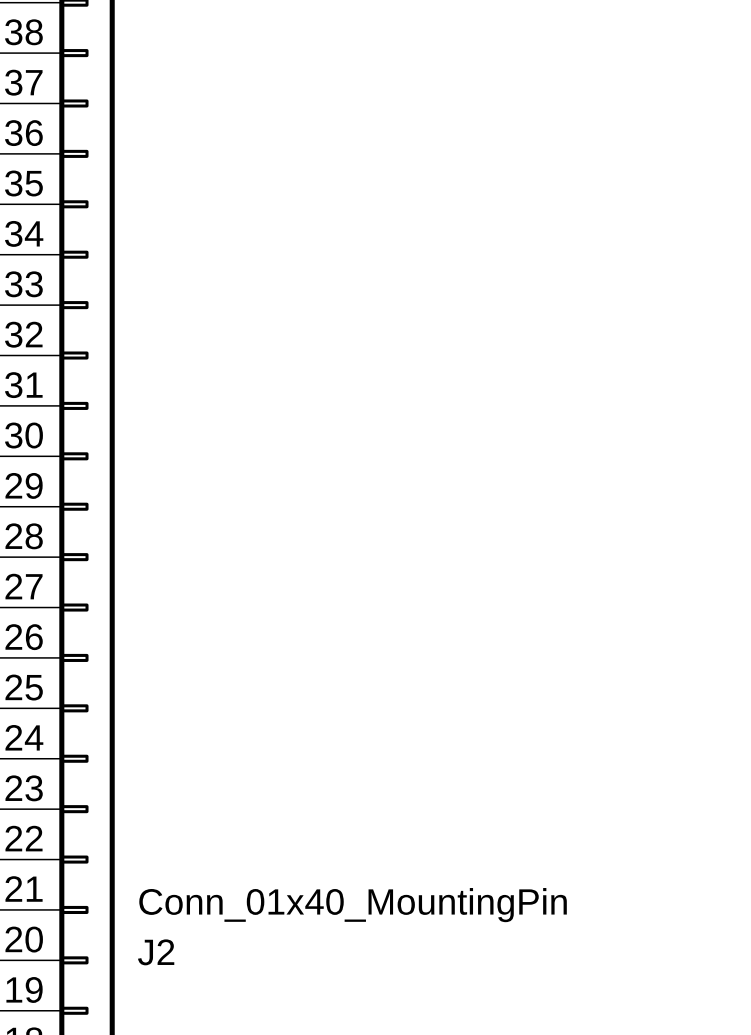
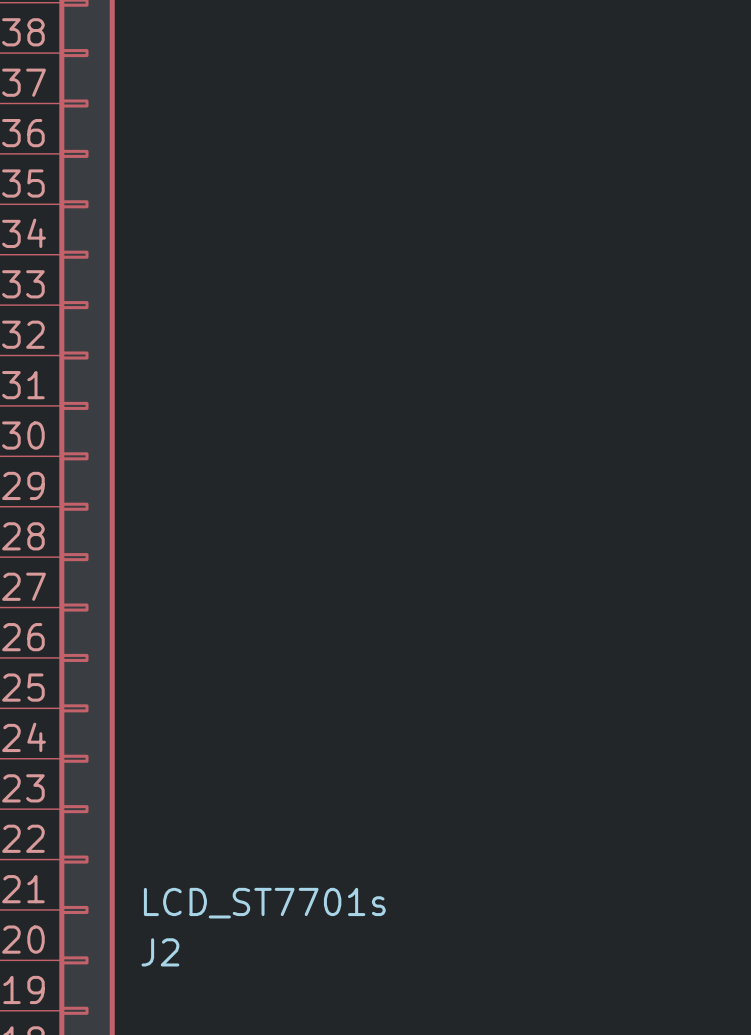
J2 value: Conn_01x40_MountingPin (353, 905) -> LCD_ST7701s (264, 903)

